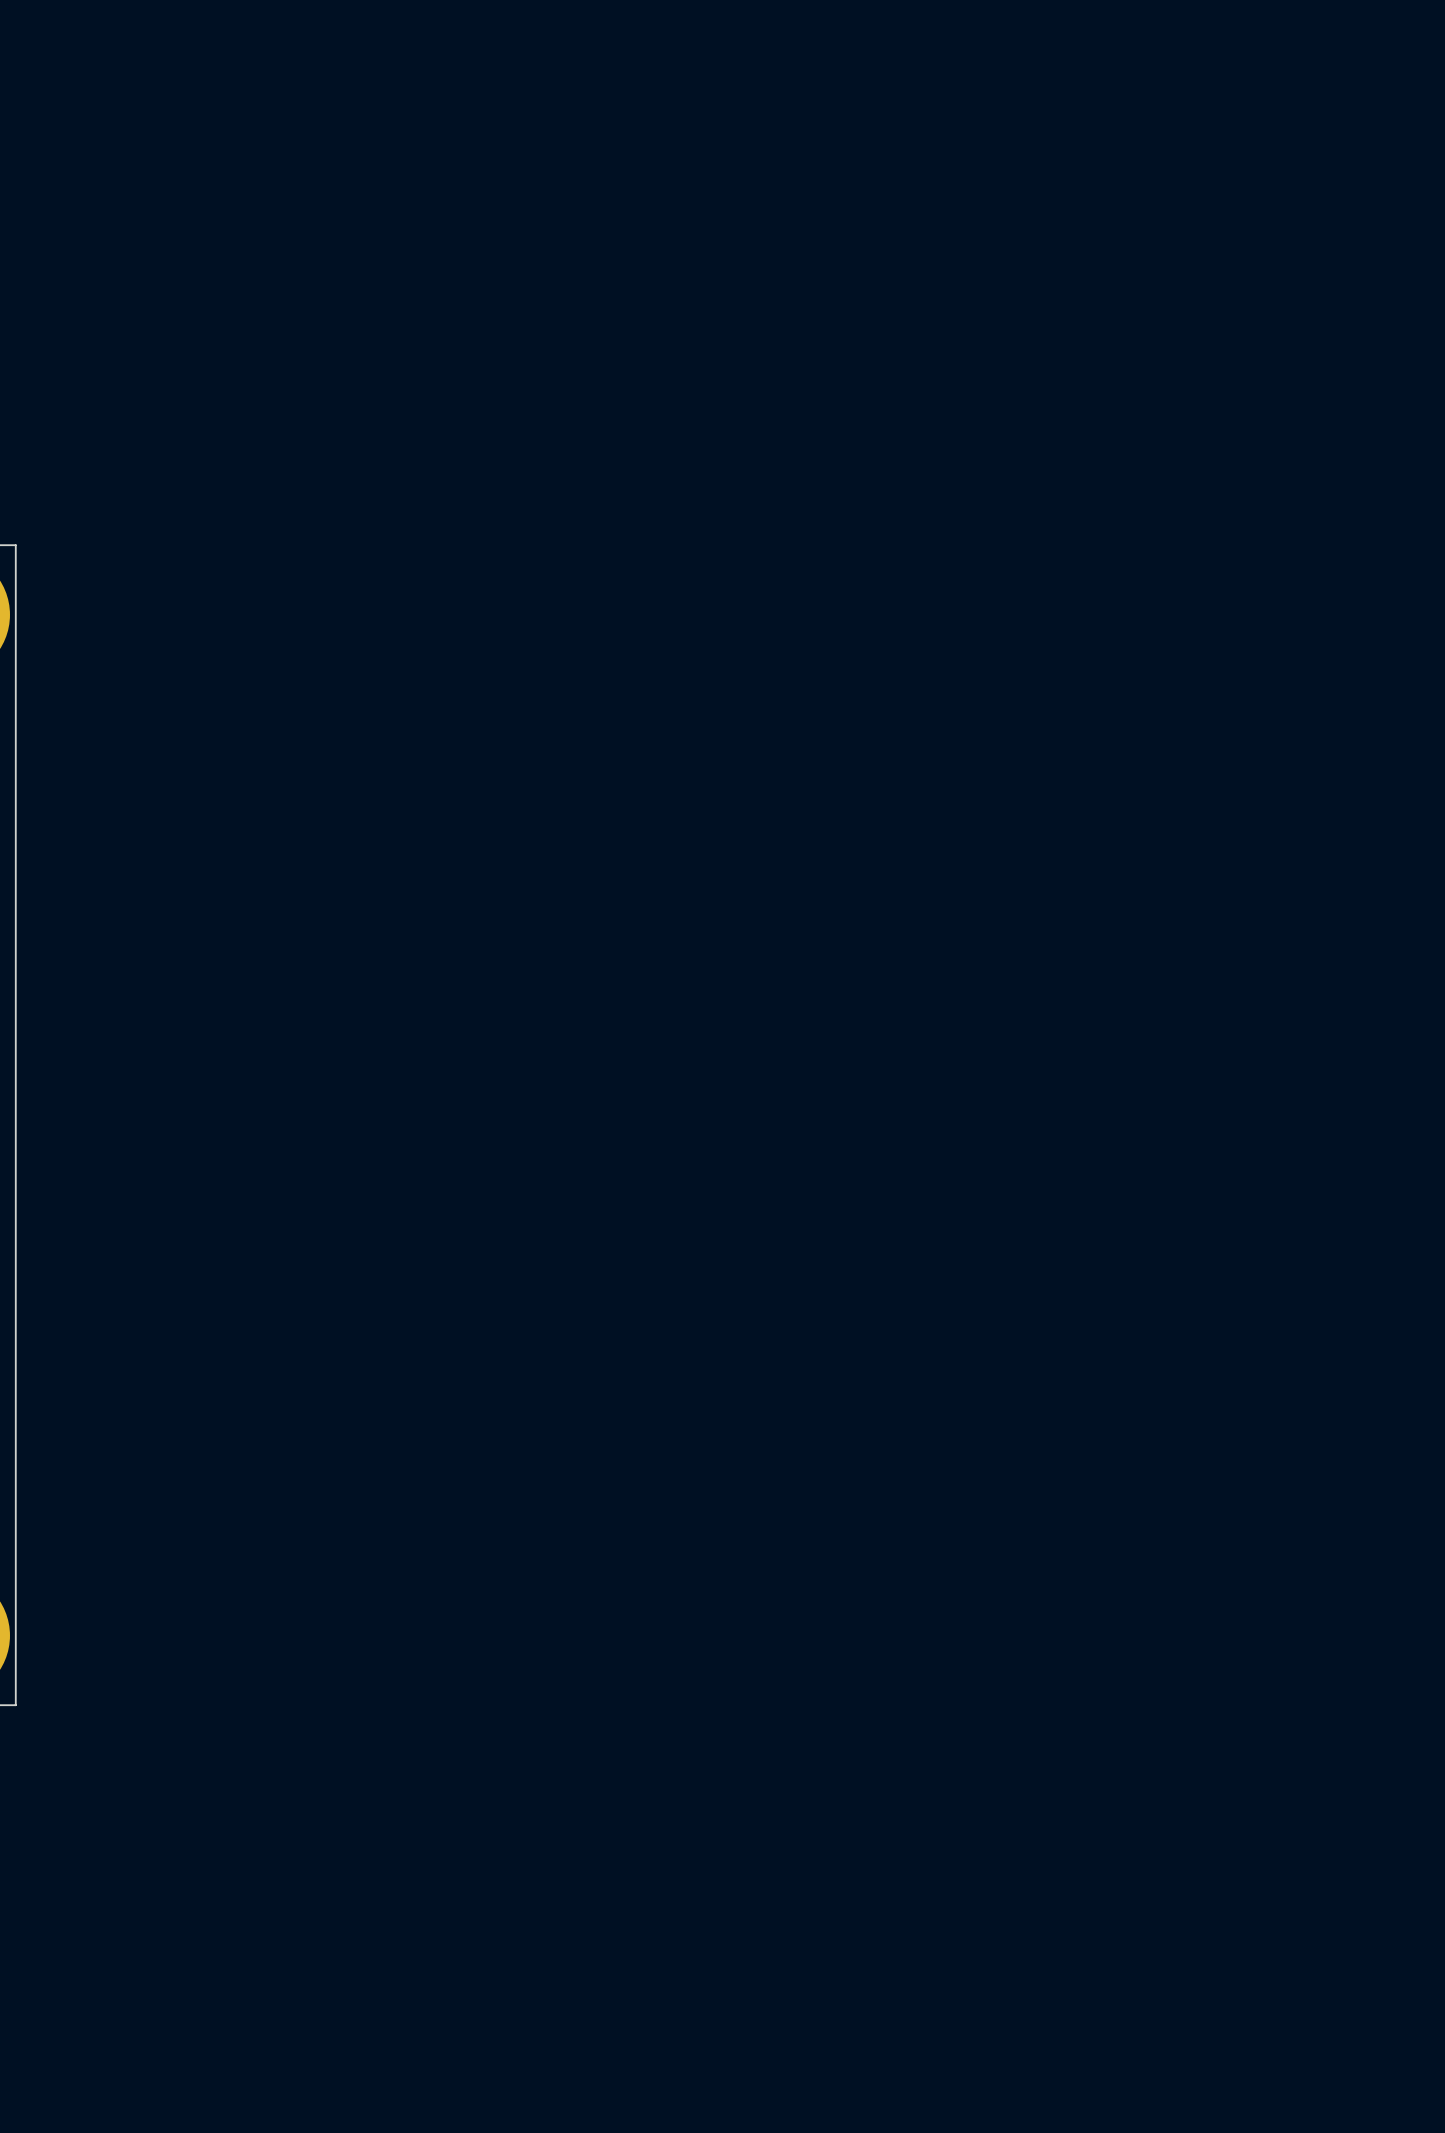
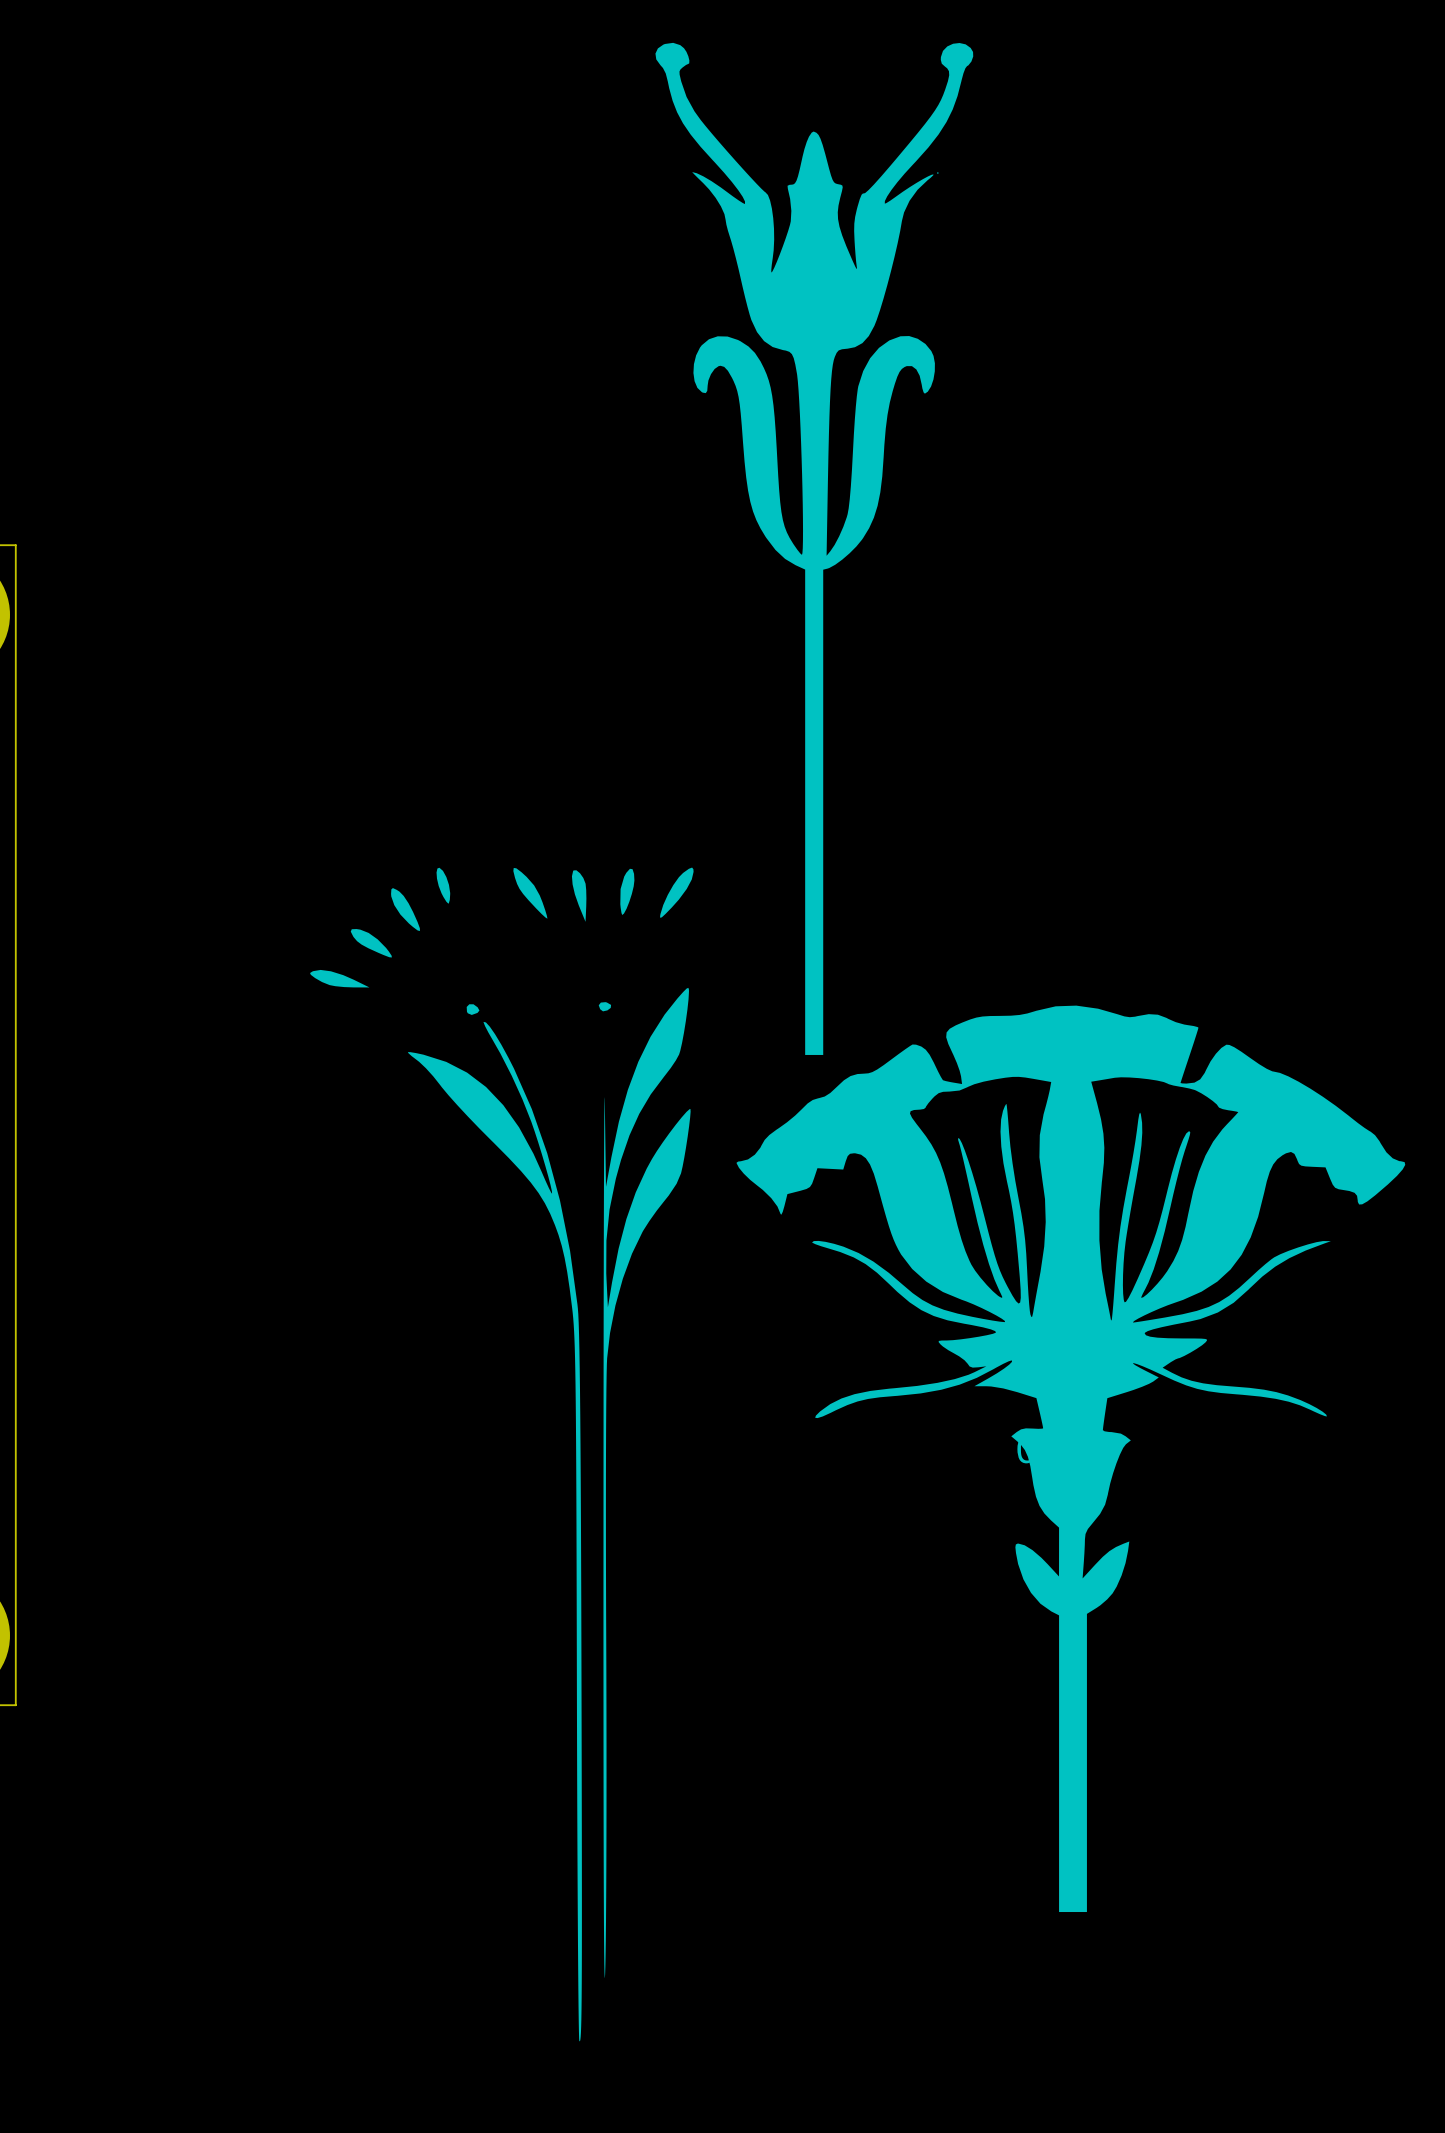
drawing: none -> [310, 42, 974, 2042]
part: none -> (1070, 1458)

